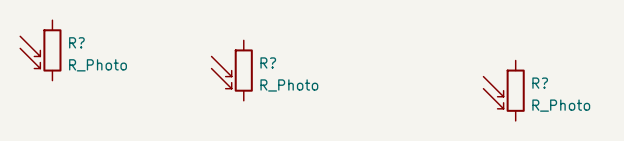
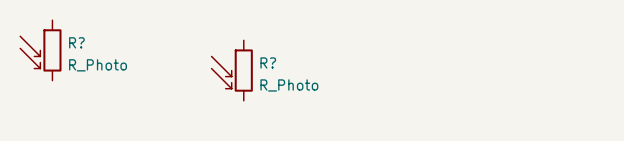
R?: R_Photo (504, 90) -> none

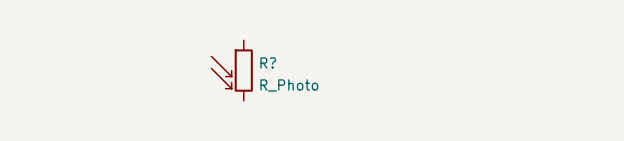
R?: R_Photo (40, 50) -> none

